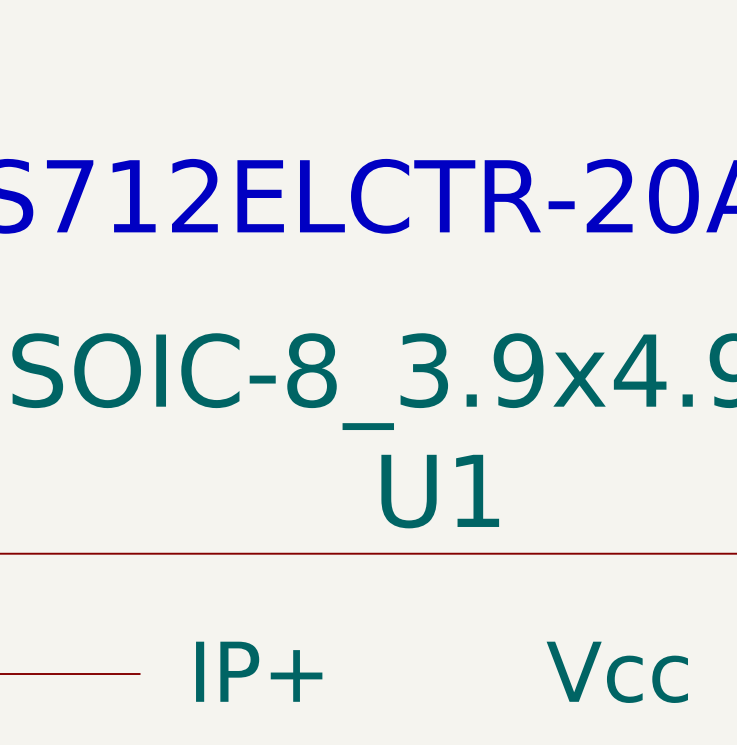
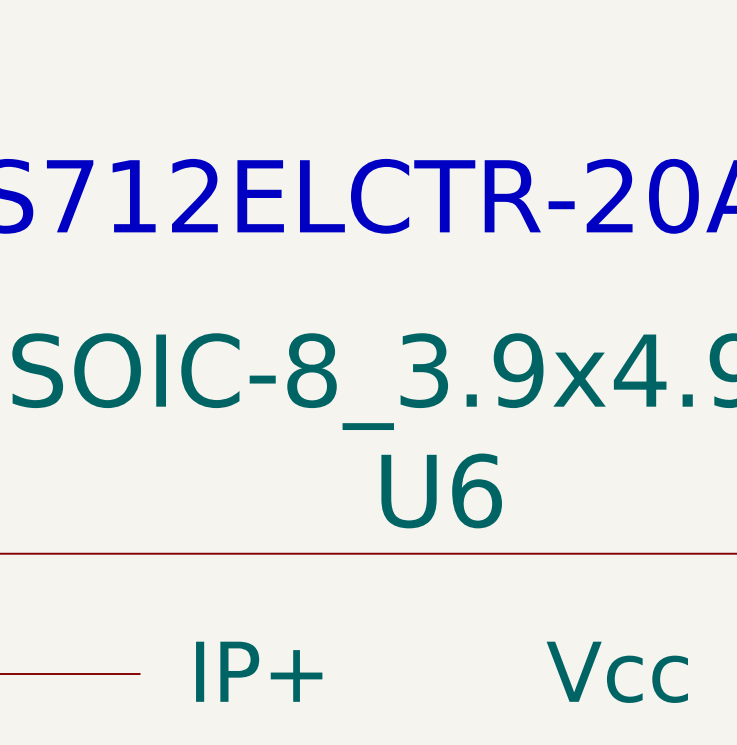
U1 name: U1 (440, 491) -> U6 (441, 490)

